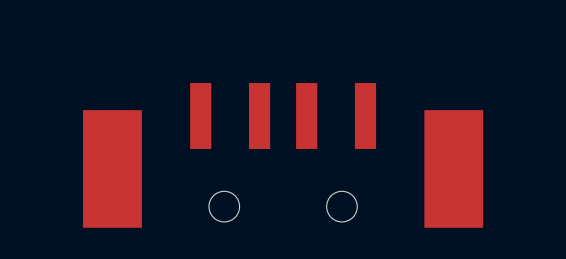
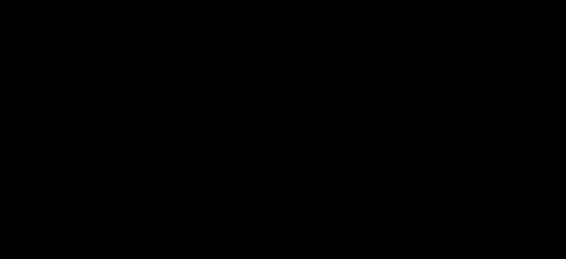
part: (283, 155) -> none

